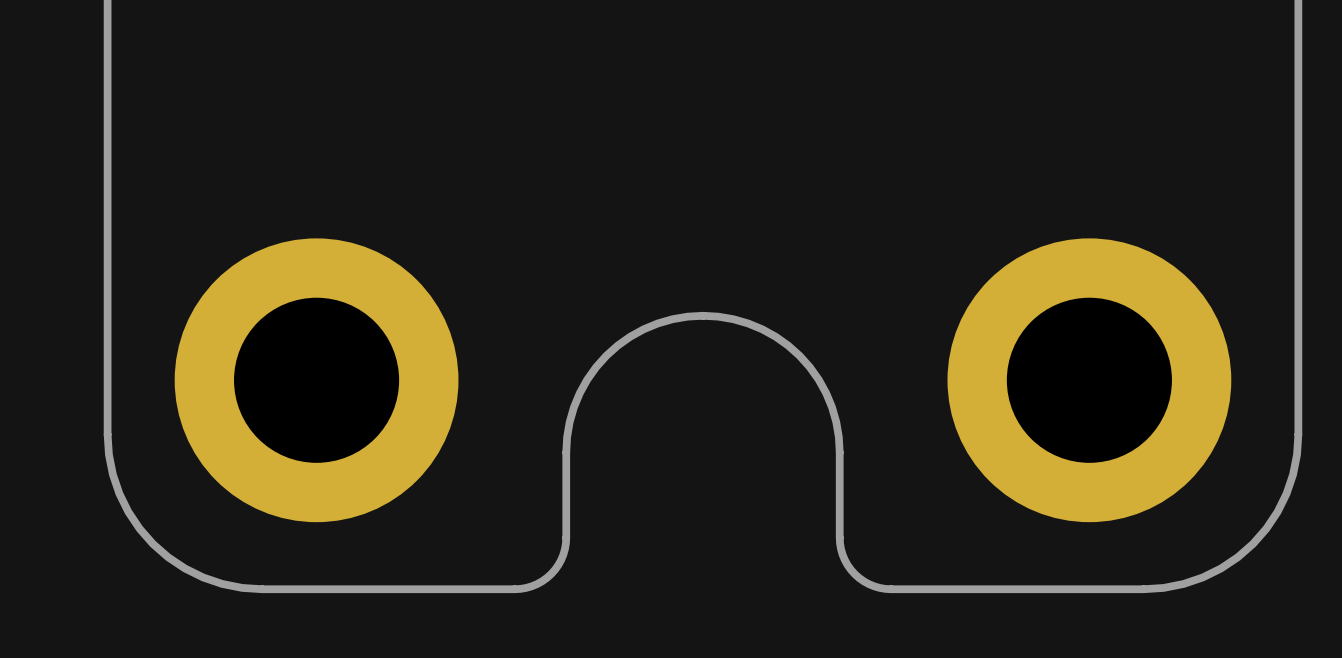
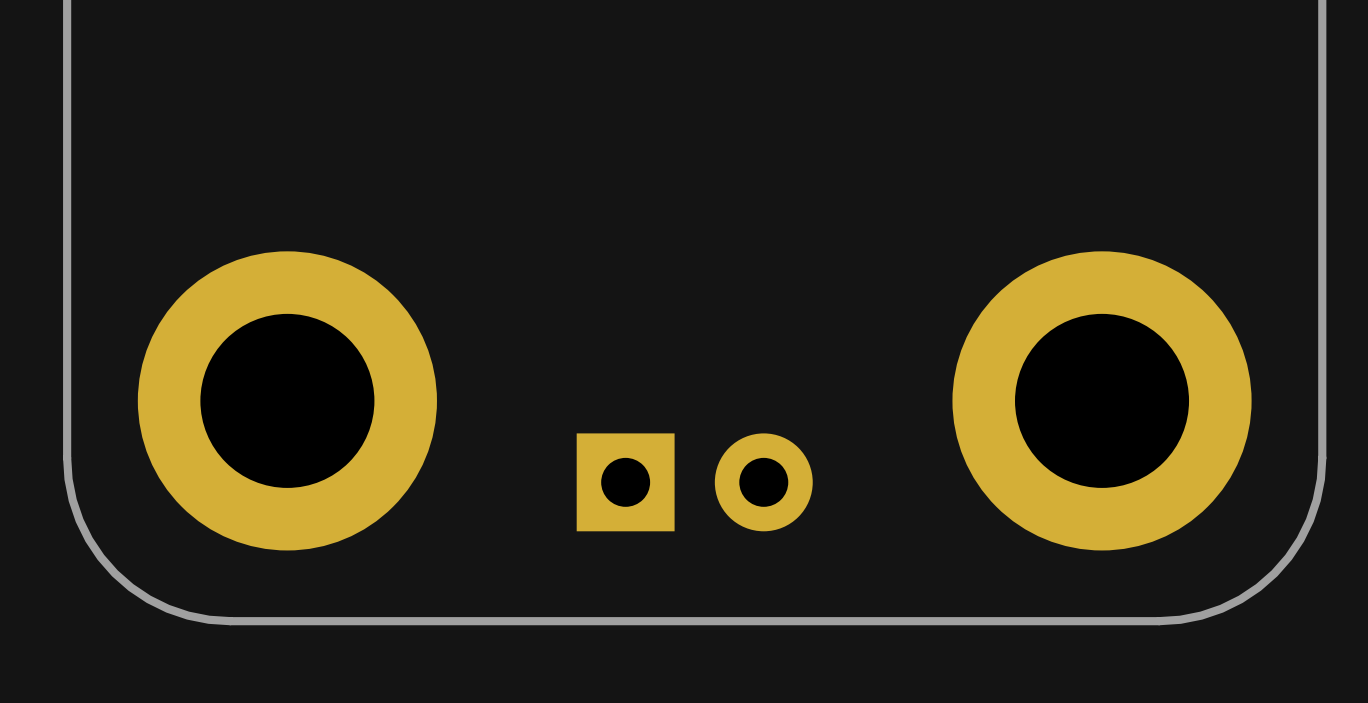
part: none -> (694, 482)
board edge: (891, 589) (874, 586) (859, 577) (850, 569) (842, 554) (839, 537) (838, 437) (832, 407) (818, 379) (809, 367) (788, 345) (762, 329) (733, 319) (702, 315) (672, 319) (657, 323) (630, 336) (606, 355) (587, 379) (573, 407) (567, 437) (566, 537) (563, 554) (554, 569) (546, 577) (531, 586) (514, 589) -> (893, 621) (496, 621)

